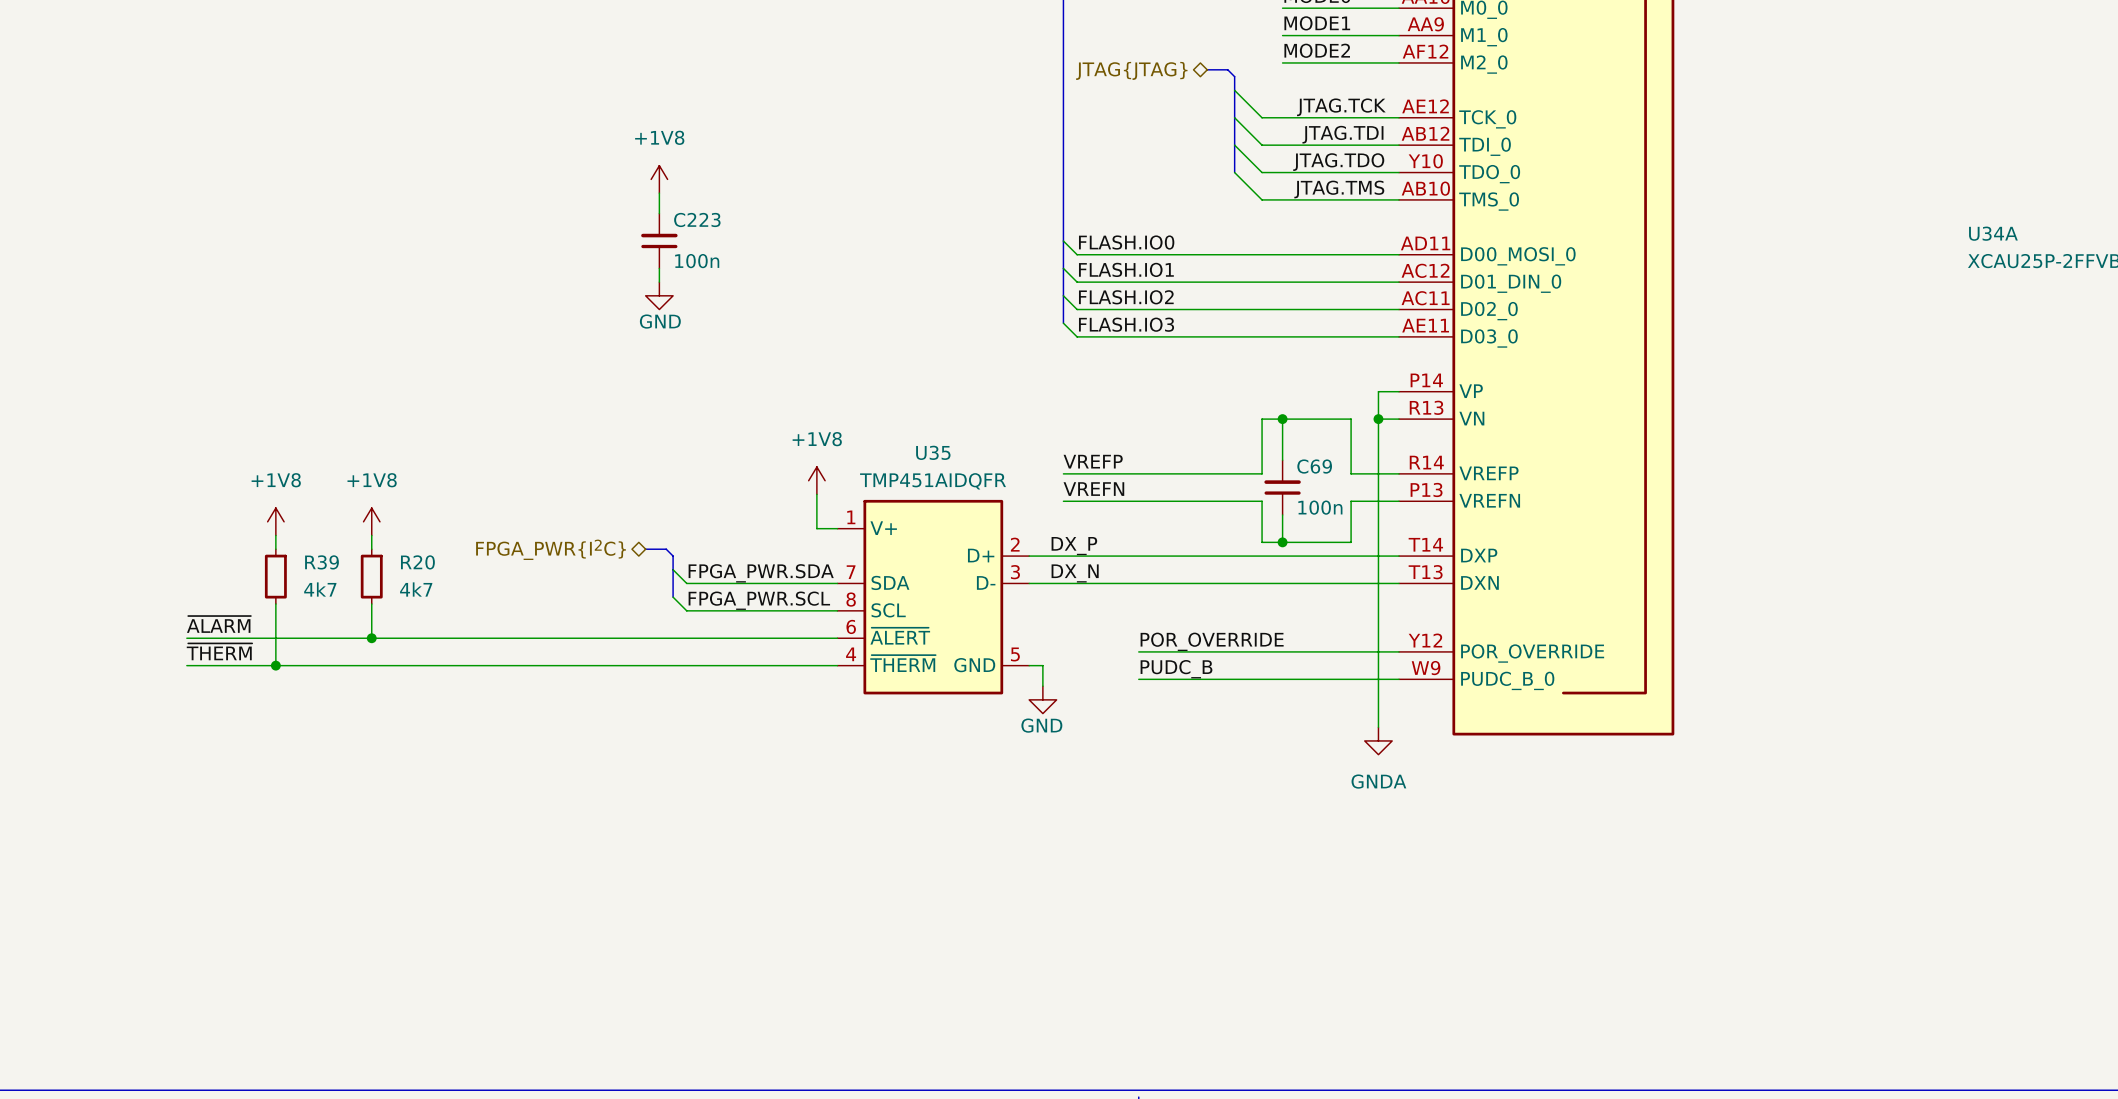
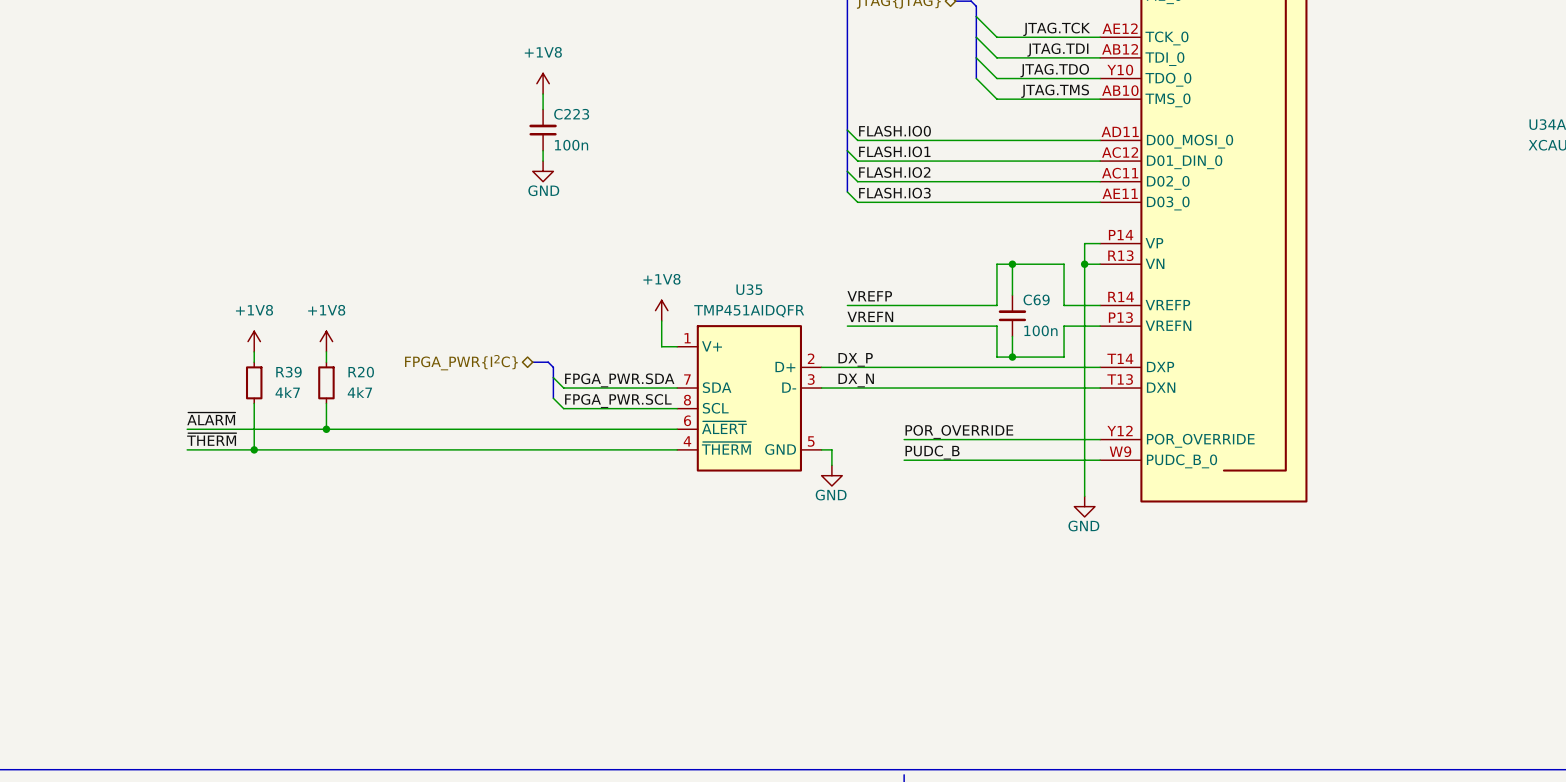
power symbol: GNDA (1378, 740) -> GND (1084, 506)

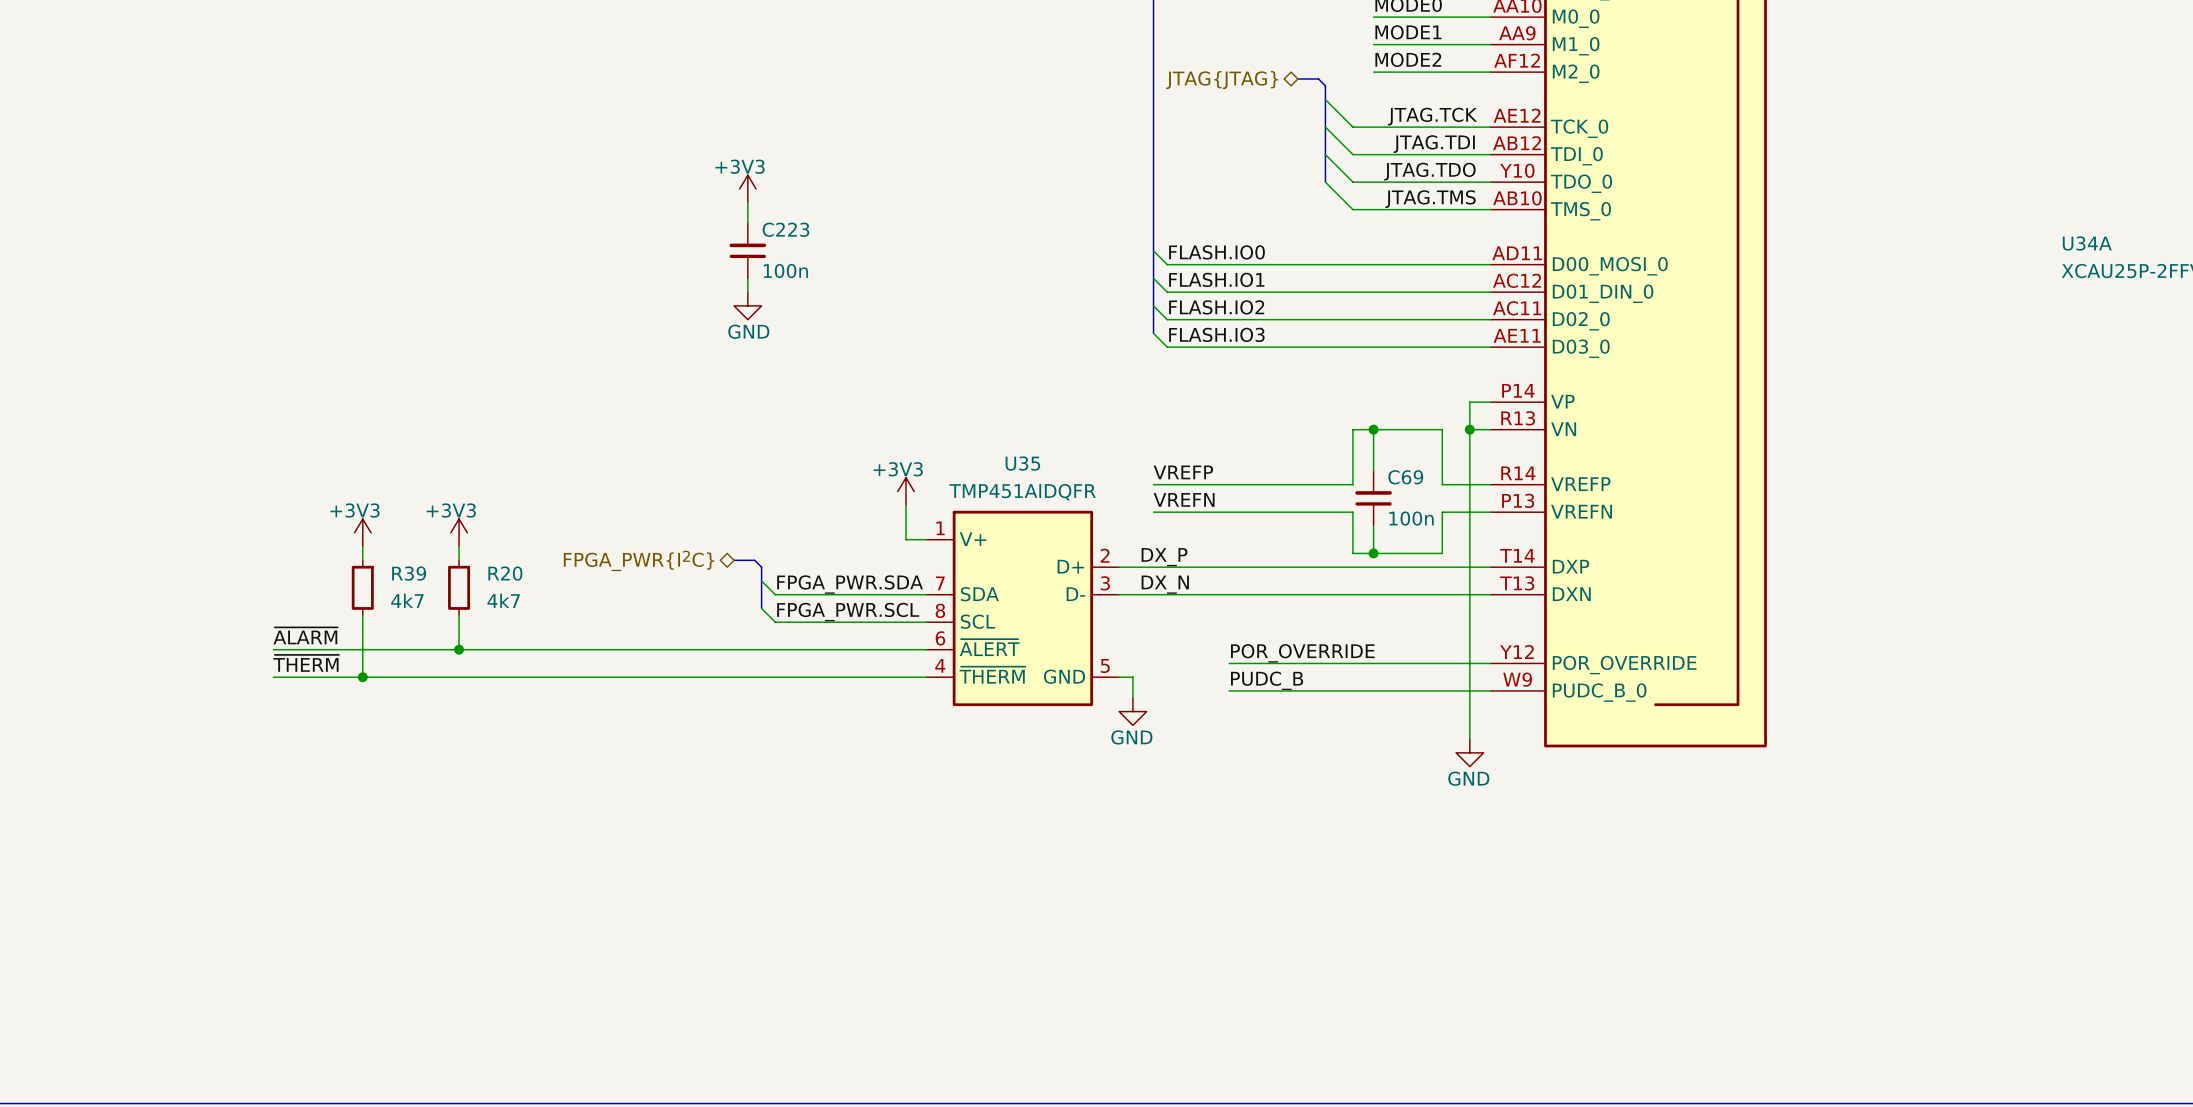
power symbol: +1V8 (543, 83) -> +3V3 (747, 189)
power symbol: +1V8 (661, 310) -> +3V3 (905, 491)
power symbol: +1V8 (254, 341) -> +3V3 (362, 532)
power symbol: +1V8 (326, 341) -> +3V3 (459, 532)

